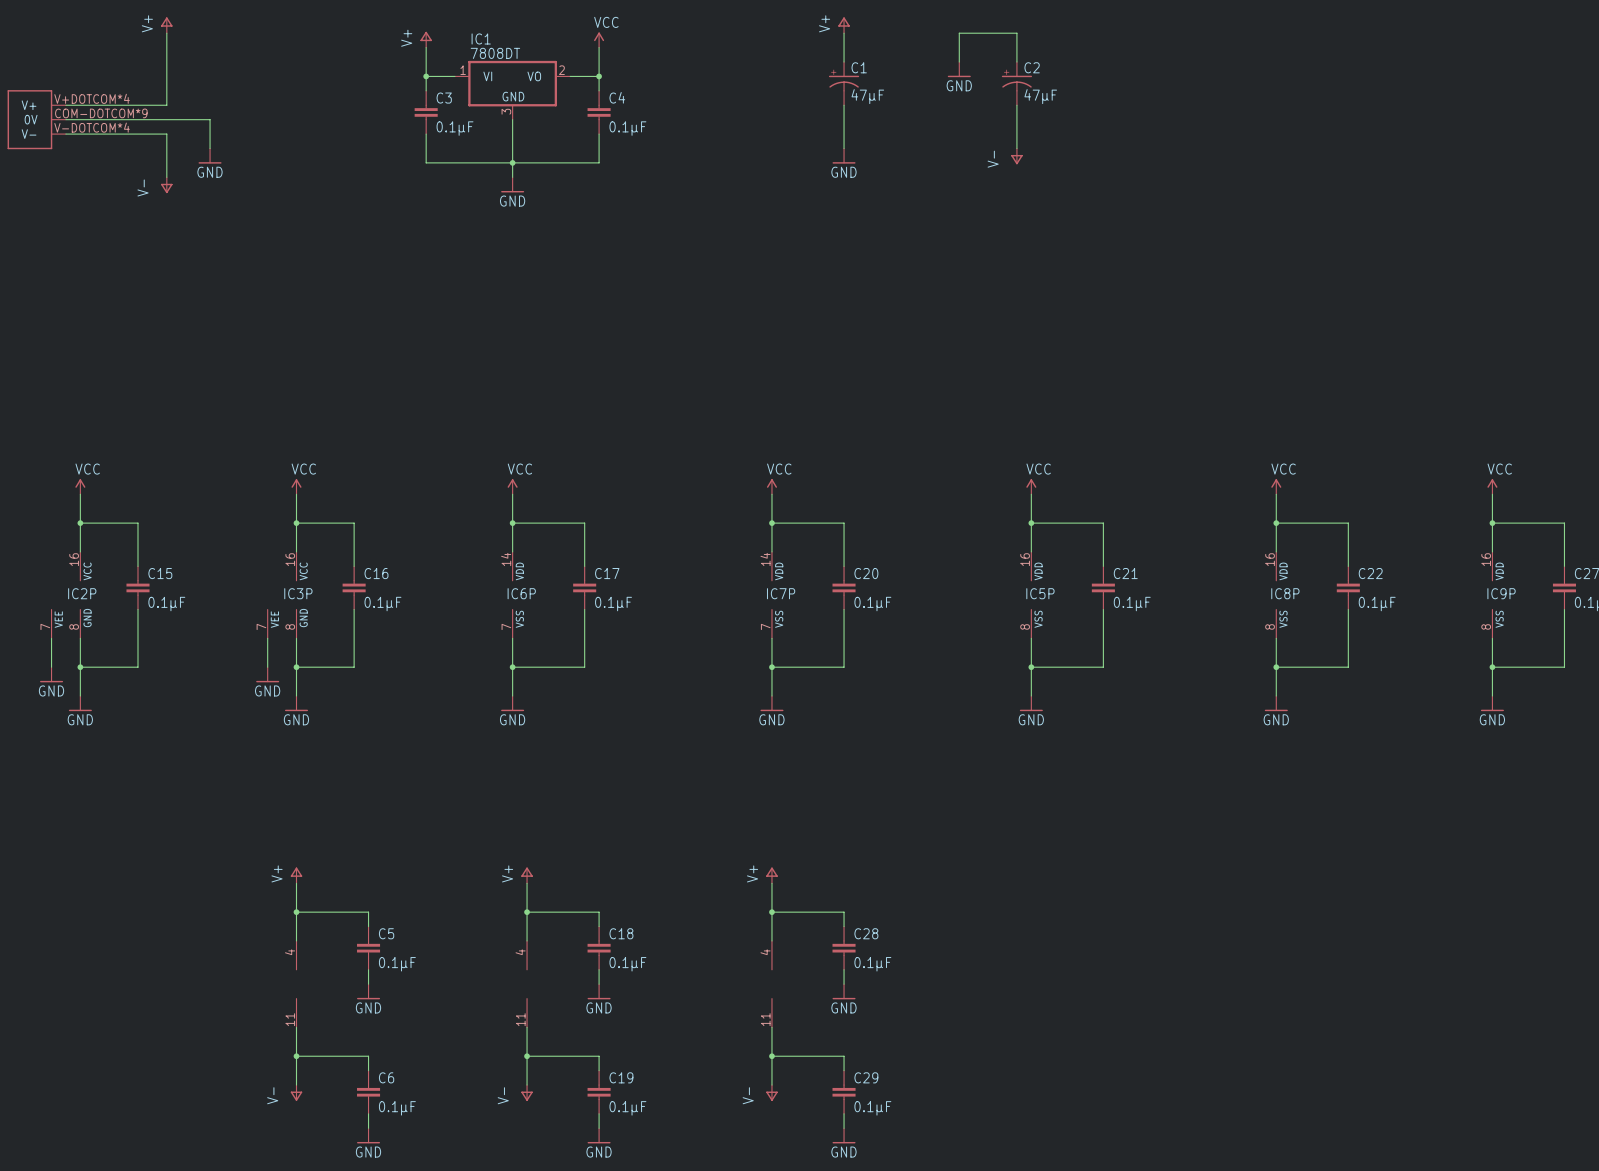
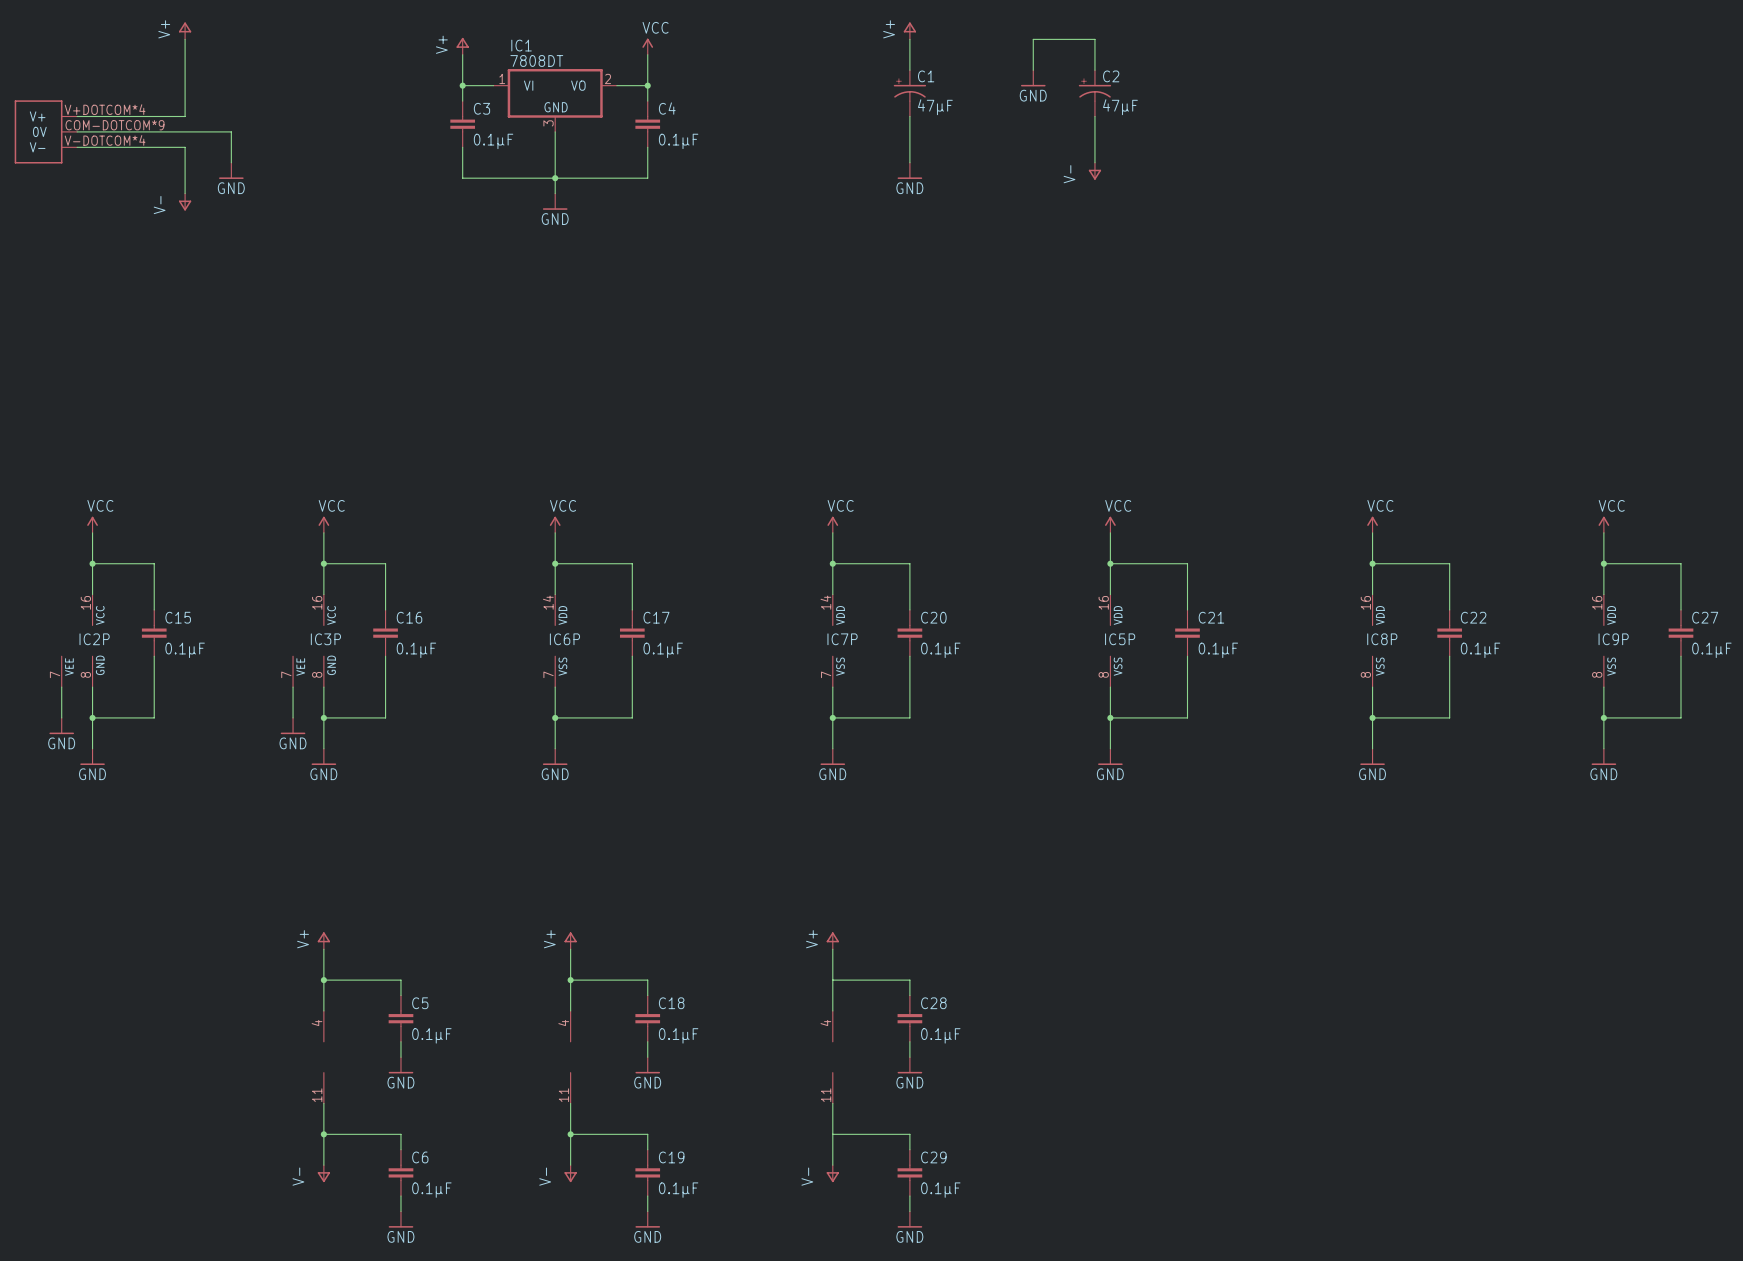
junction: (771, 912) -> none
junction: (771, 1056) -> none

